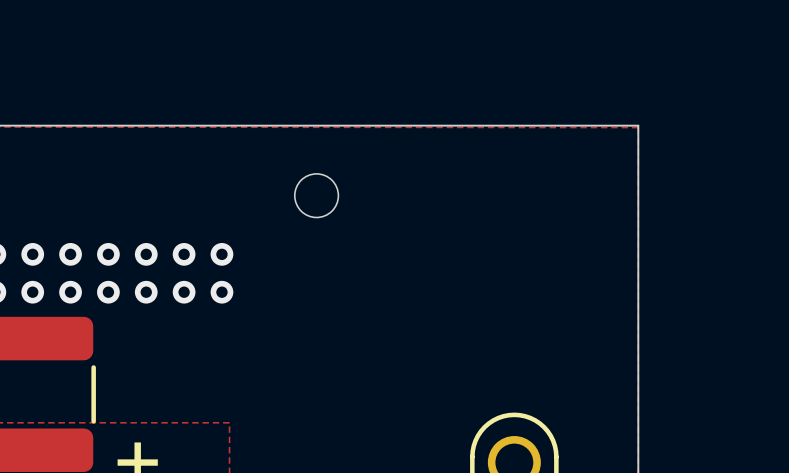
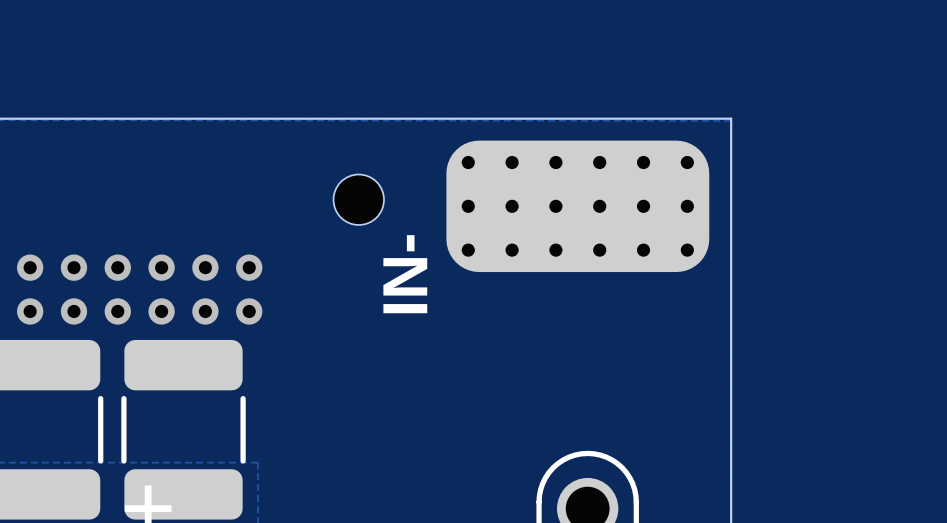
part: none -> (577, 206)
text: none -> IN- (405, 274)
part: none -> (183, 429)

